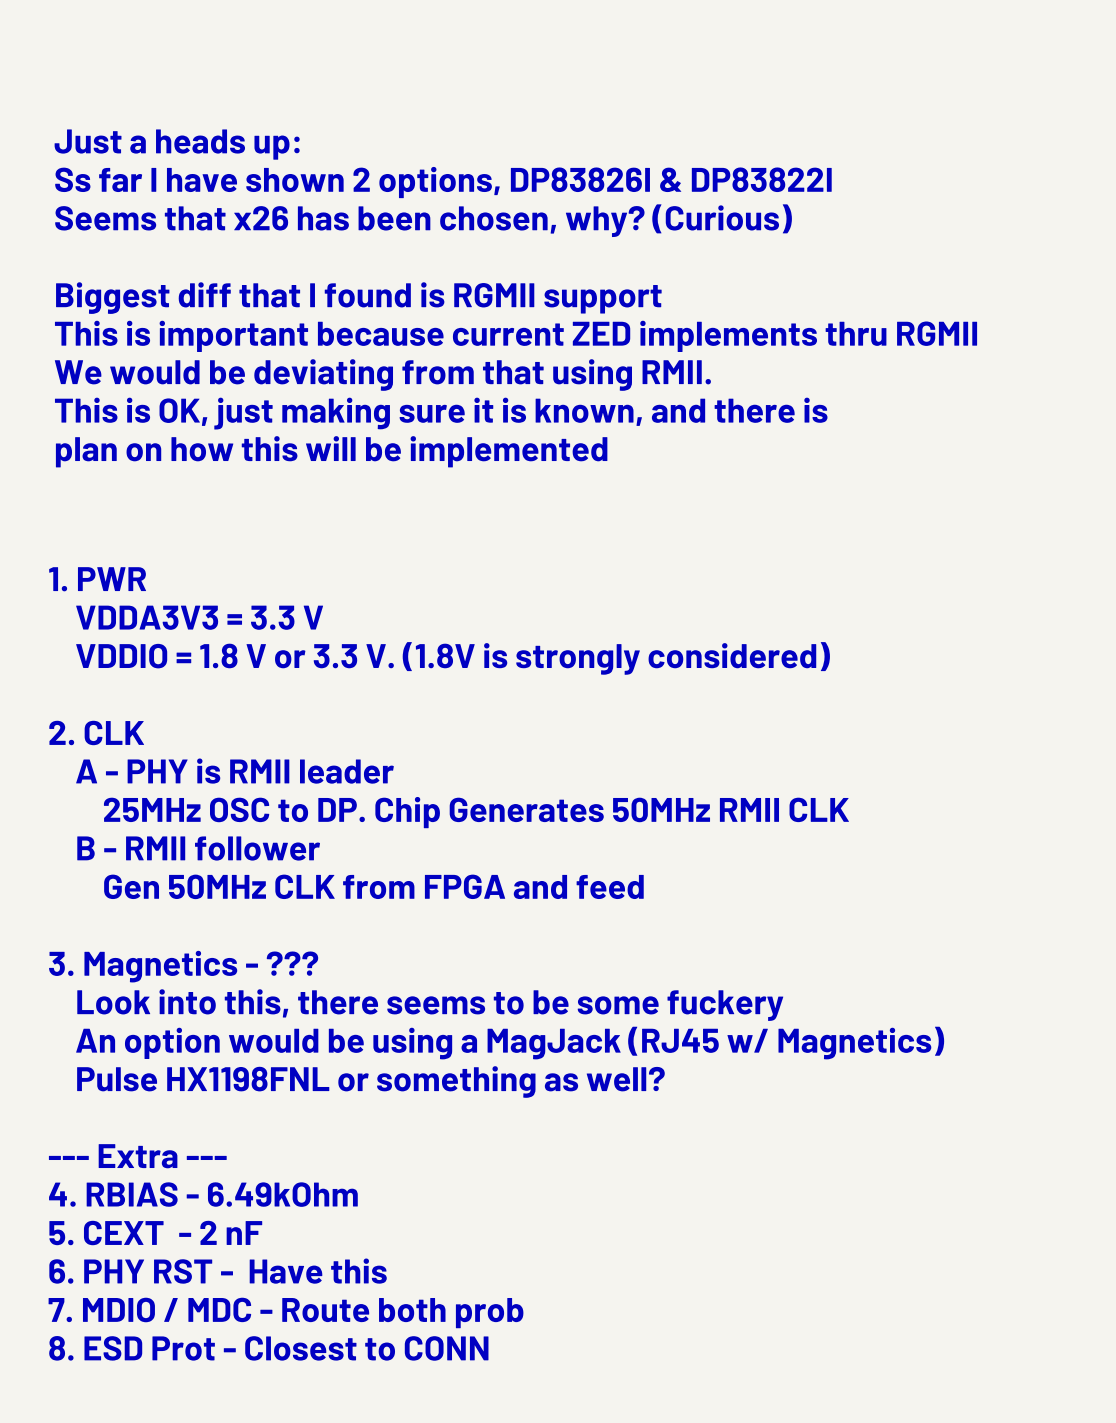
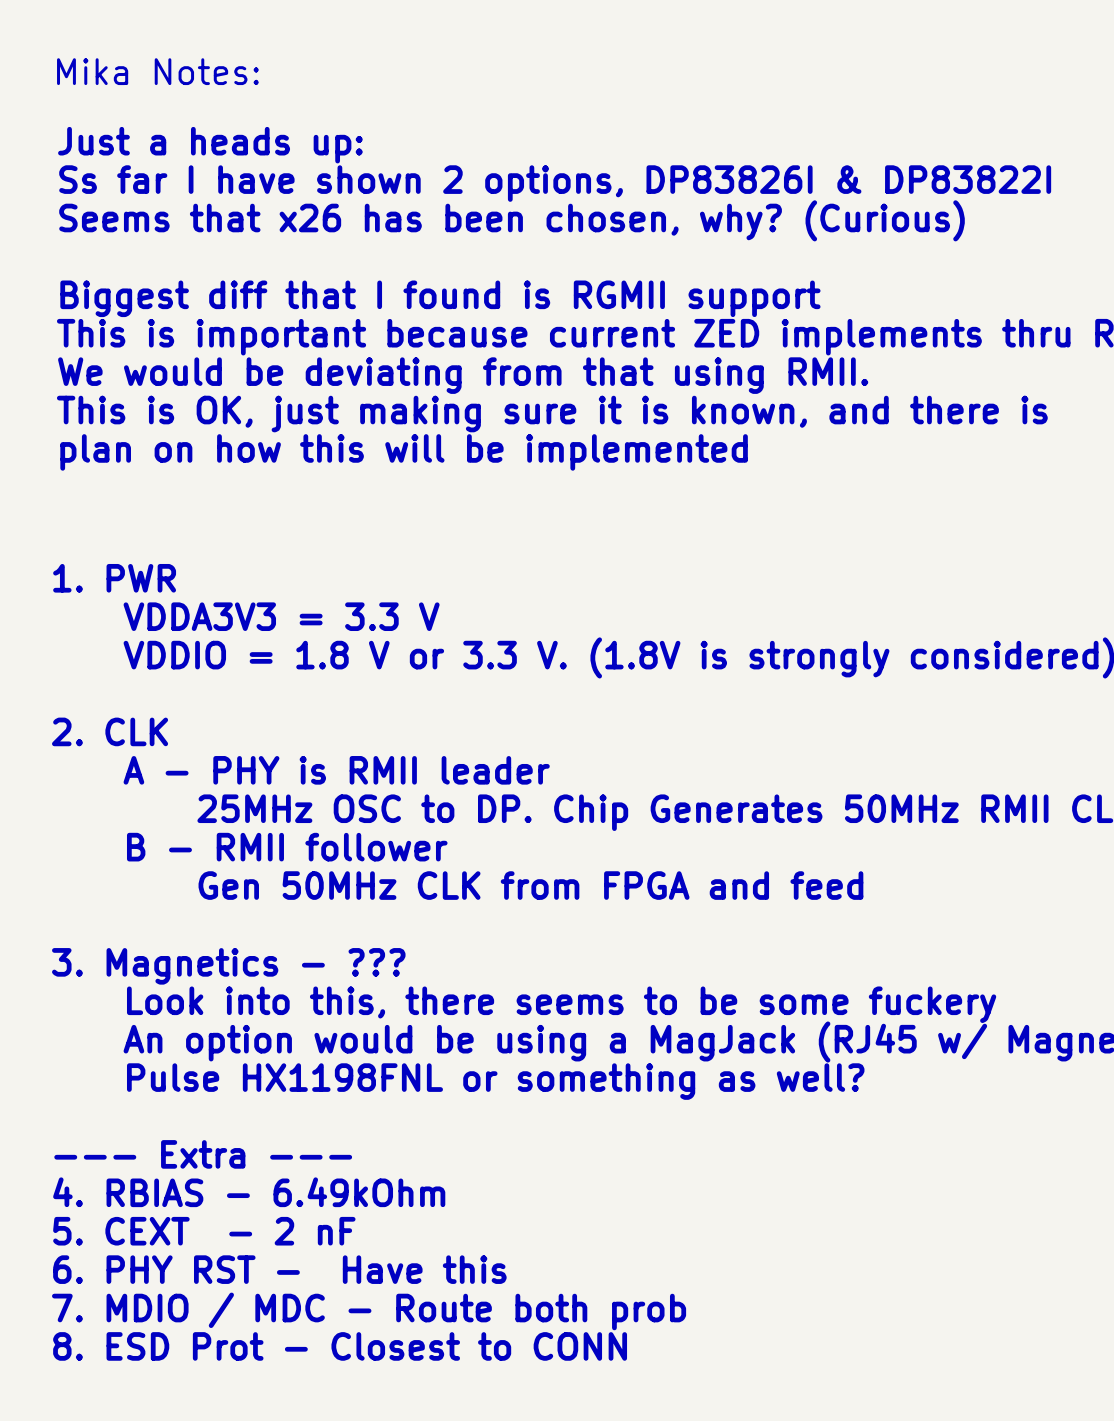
text: none -> Mika Notes: (157, 71)

